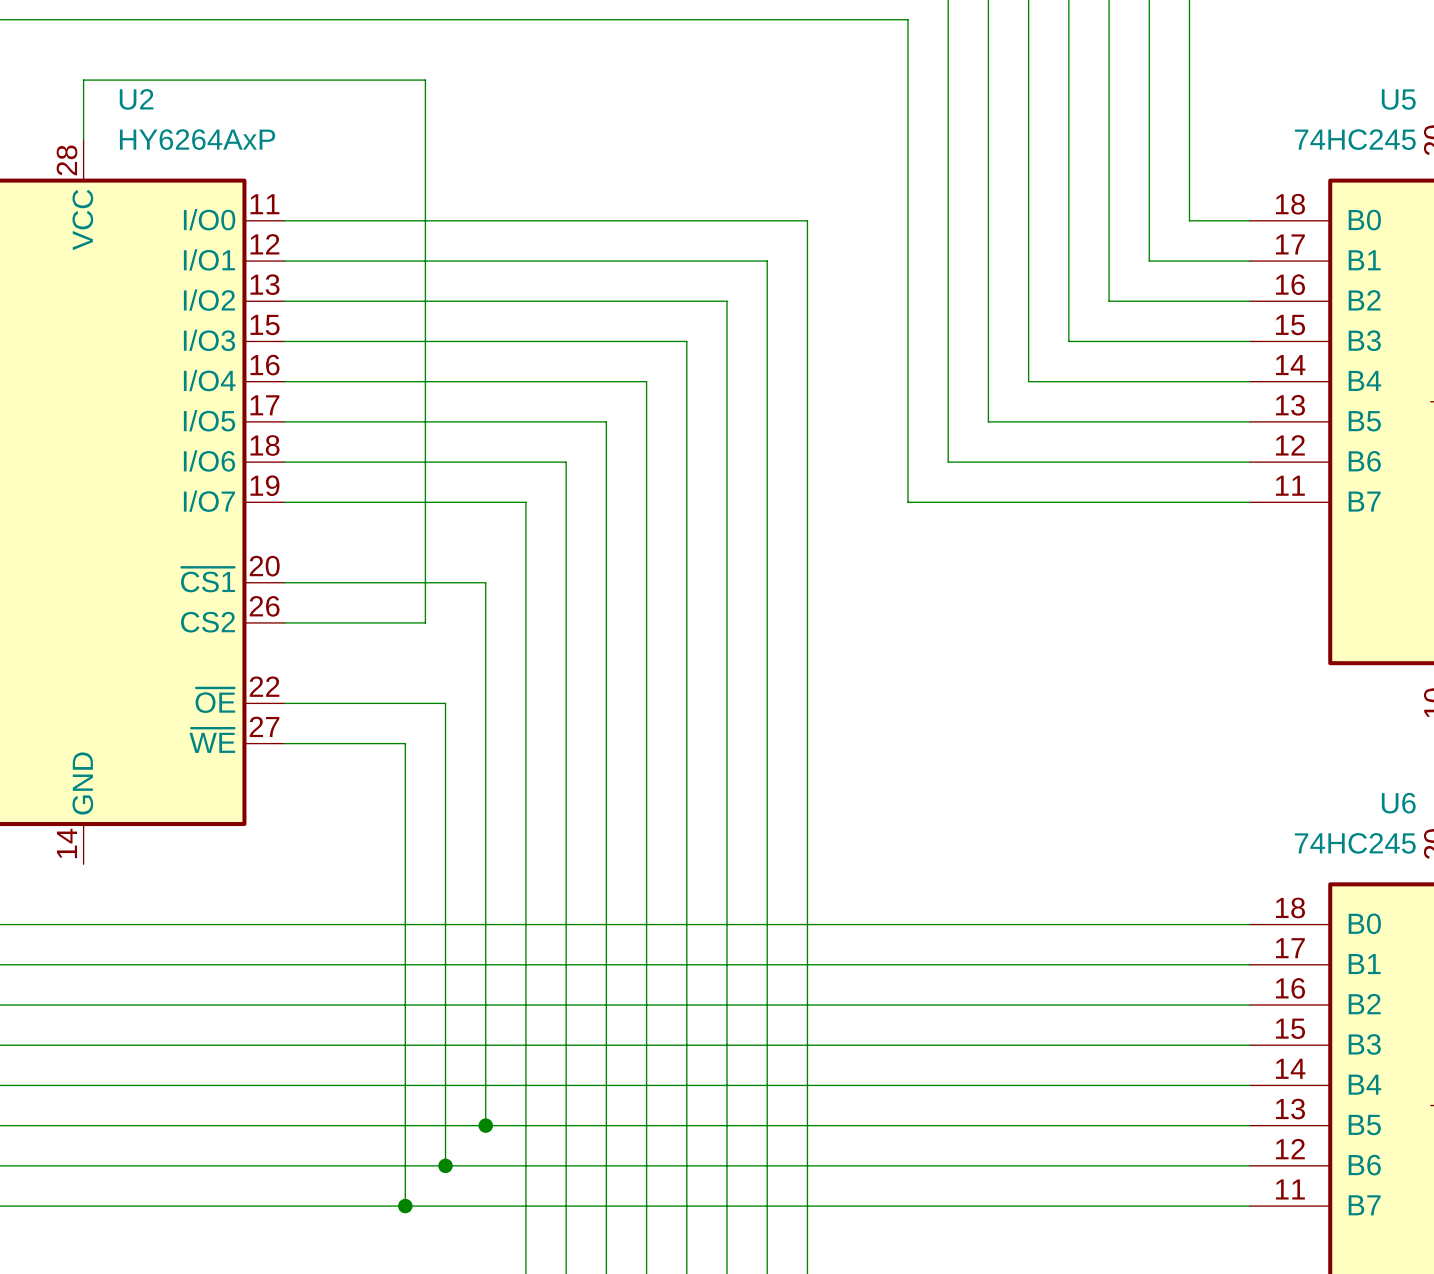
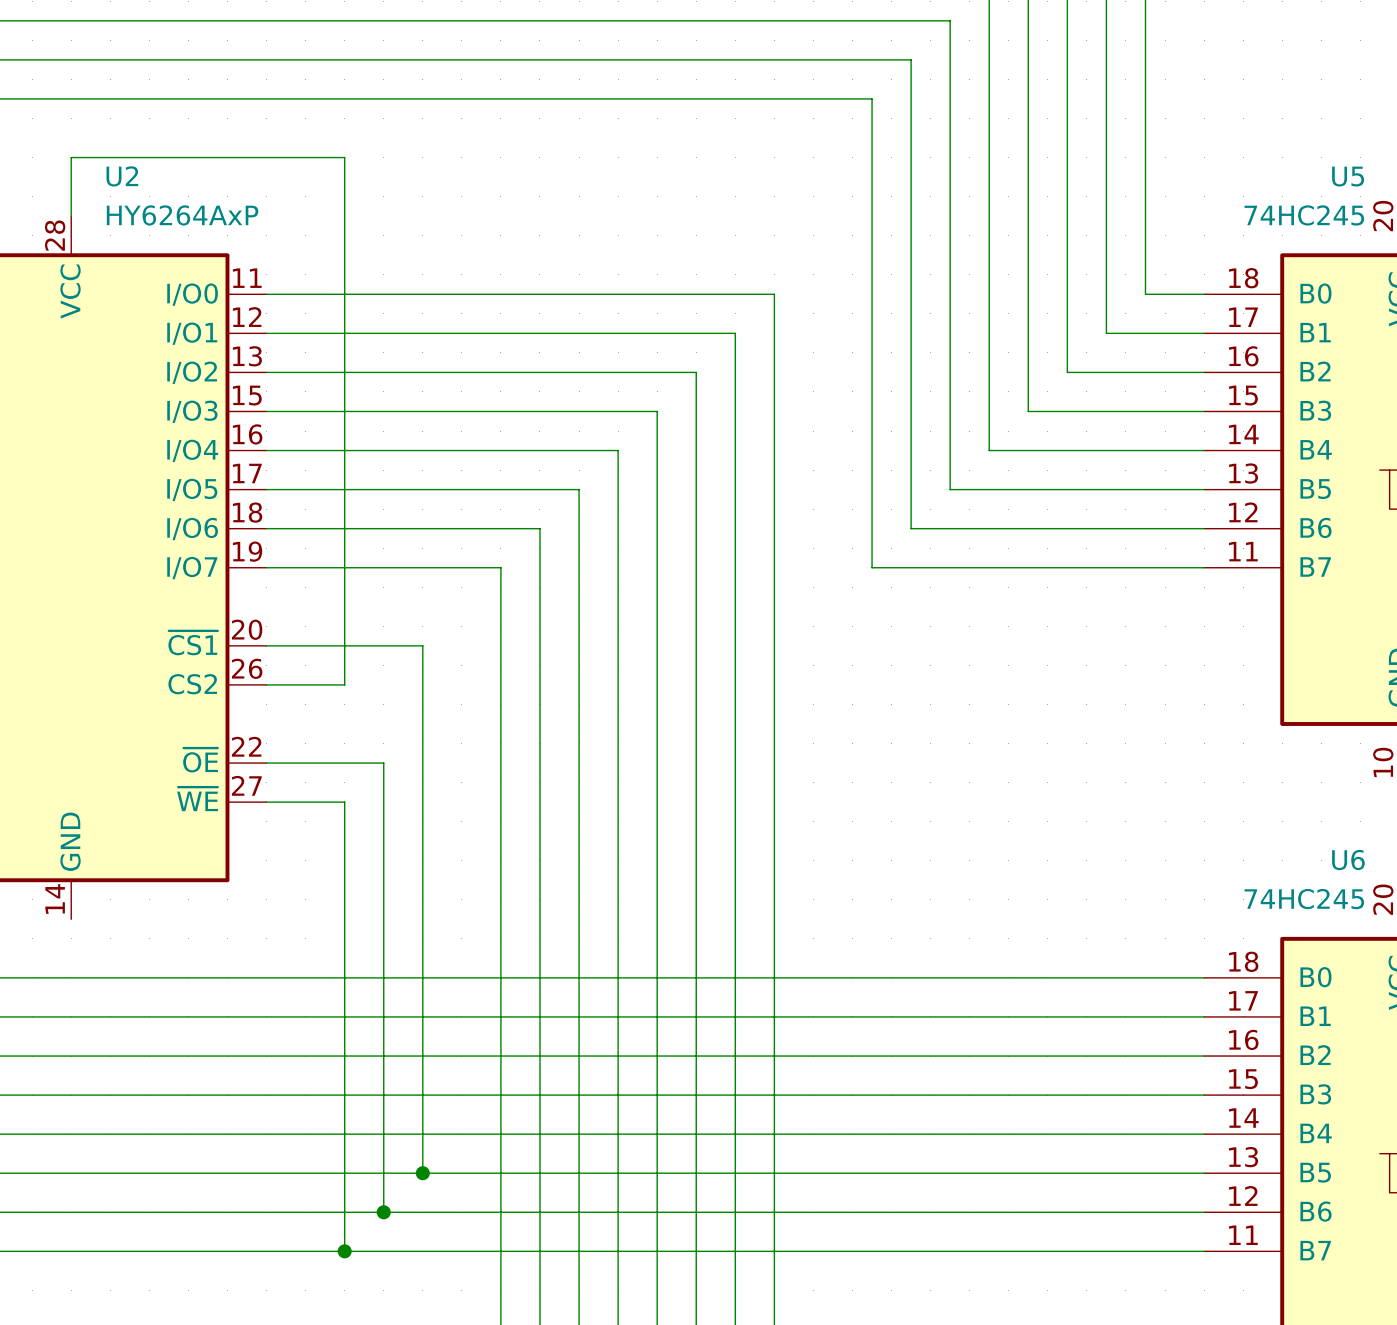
wire: (365, 80) (425, 80) (425, 622) (365, 622) -> (344, 157) (344, 684)
wire: (445, 582) (485, 582) (485, 1125) -> none
wire: (405, 703) (445, 703) -> (422, 645) (422, 763)
wire: (365, 743) (405, 743) -> (383, 763) (383, 802)
wire: none -> (344, 802) (344, 1251)
wire: (445, 1125) (445, 1165) -> none
junction: none -> (422, 1173)
junction: (485, 1125) -> none
wire: (405, 1165) (405, 1206) -> none
junction: none -> (383, 1212)
junction: (445, 1165) -> none
junction: none -> (344, 1251)
junction: (405, 1206) -> none

